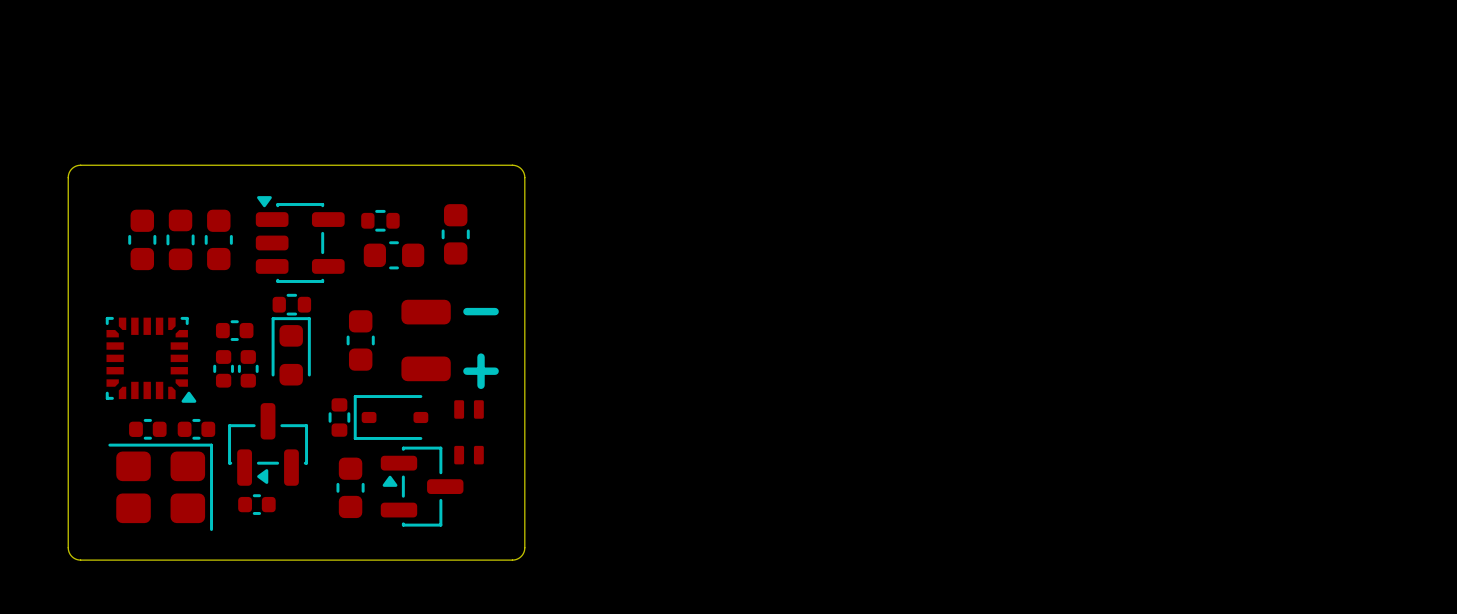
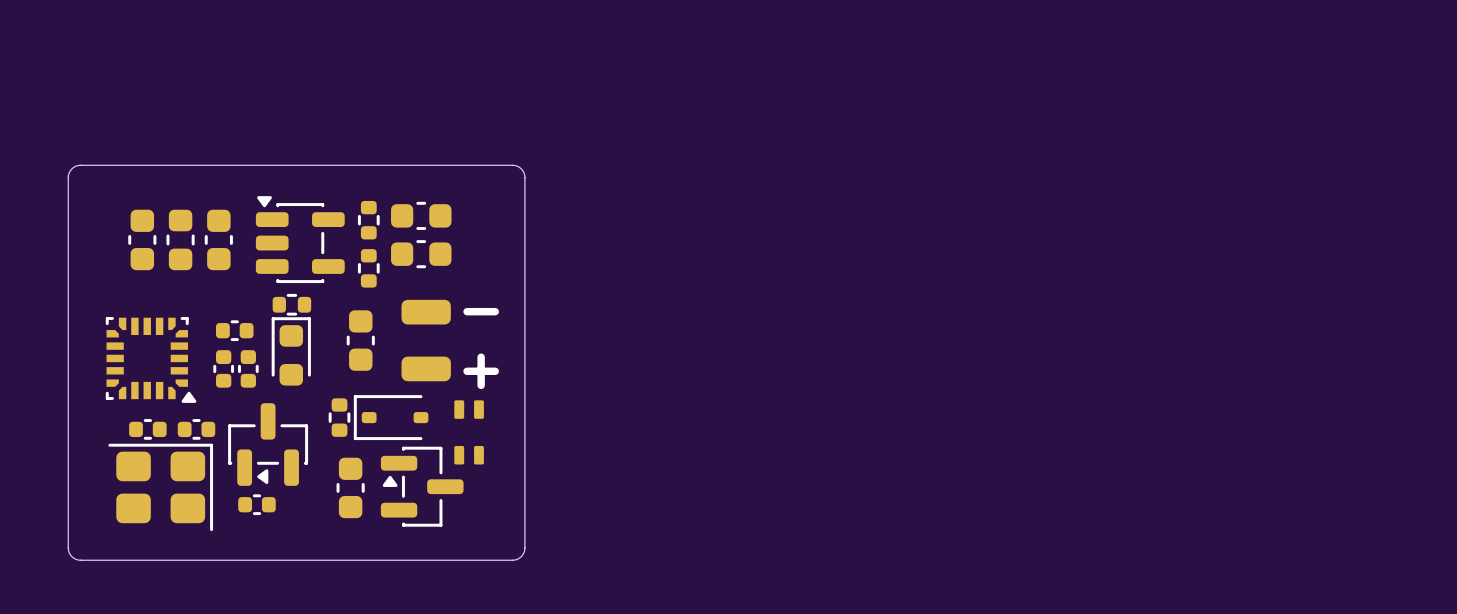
part: none -> (421, 215)
part rotation: 0° (380, 220) -> 90° clockwise (368, 220)
part: (455, 234) -> none
part: none -> (421, 254)
part: (394, 255) -> none
part: none -> (368, 268)

